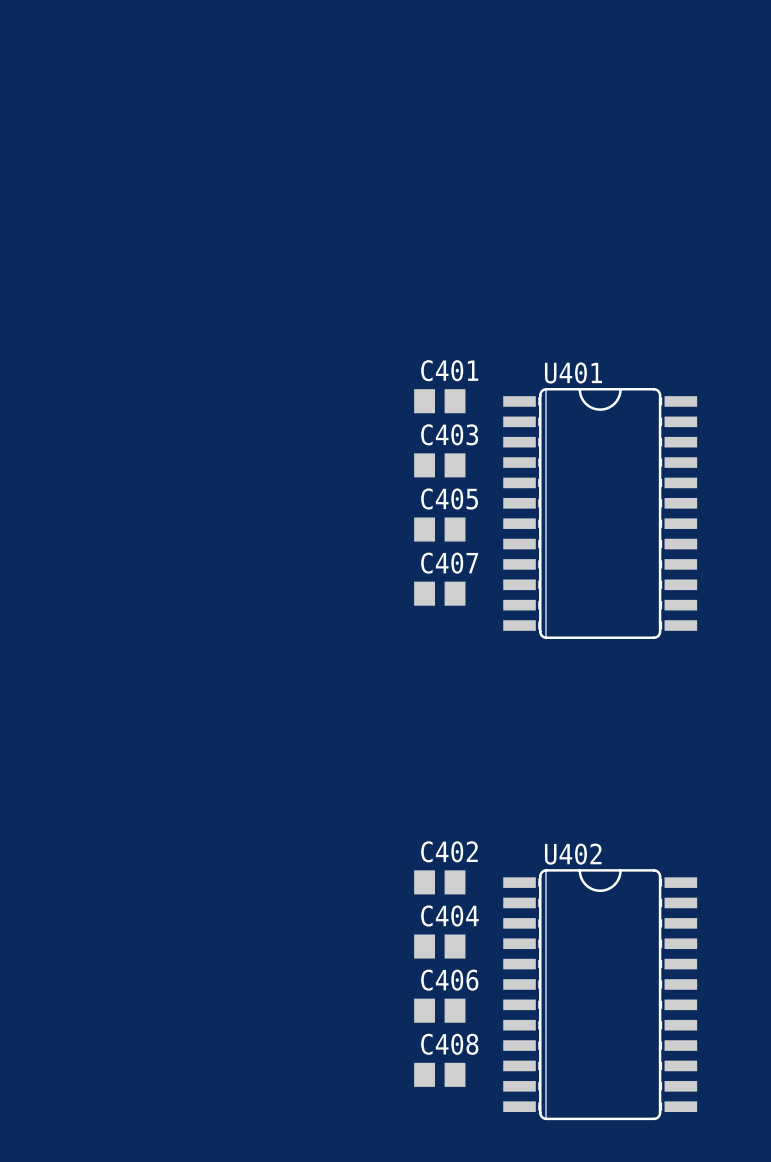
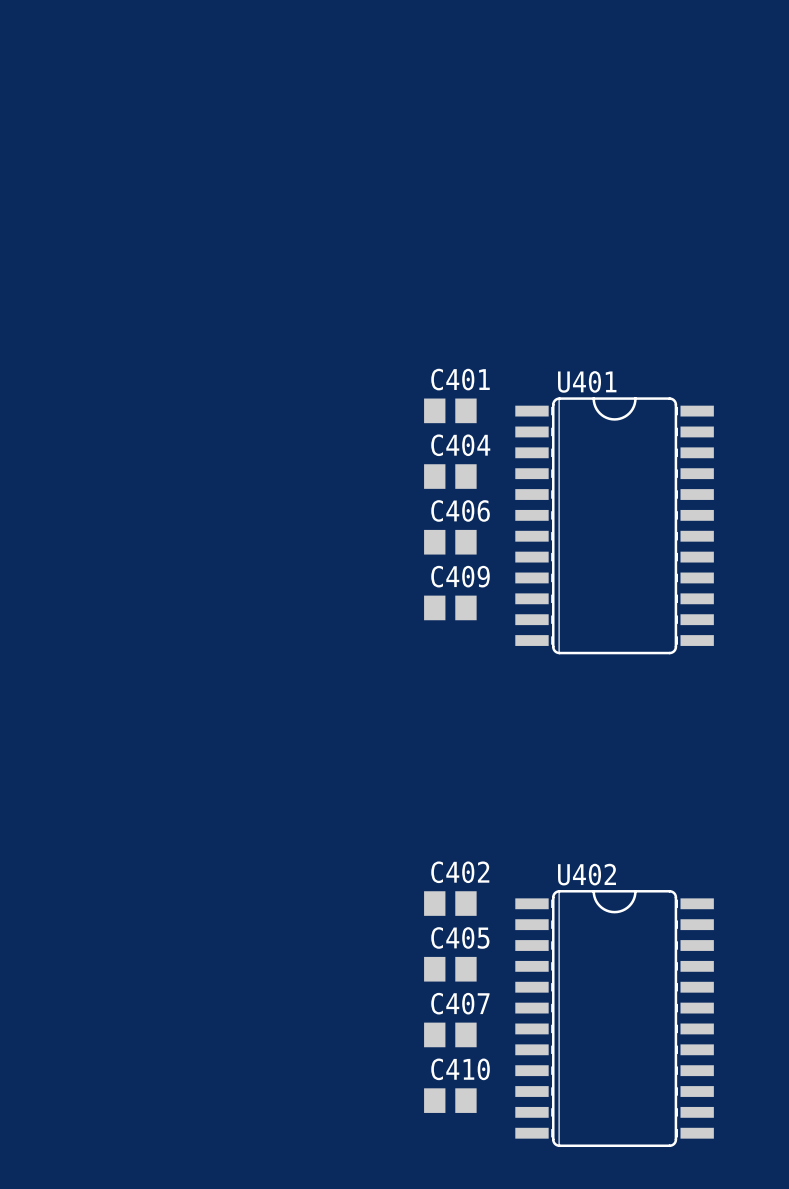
C403 name: C403 (449, 434) -> C404 (460, 445)
C405 name: C405 (449, 498) -> C406 (460, 510)
C407 name: C407 (449, 563) -> C409 (460, 576)
C404 name: C404 (449, 915) -> C405 (460, 937)
C406 name: C406 (449, 980) -> C407 (460, 1003)
C408 name: C408 (449, 1044) -> C410 (460, 1069)

